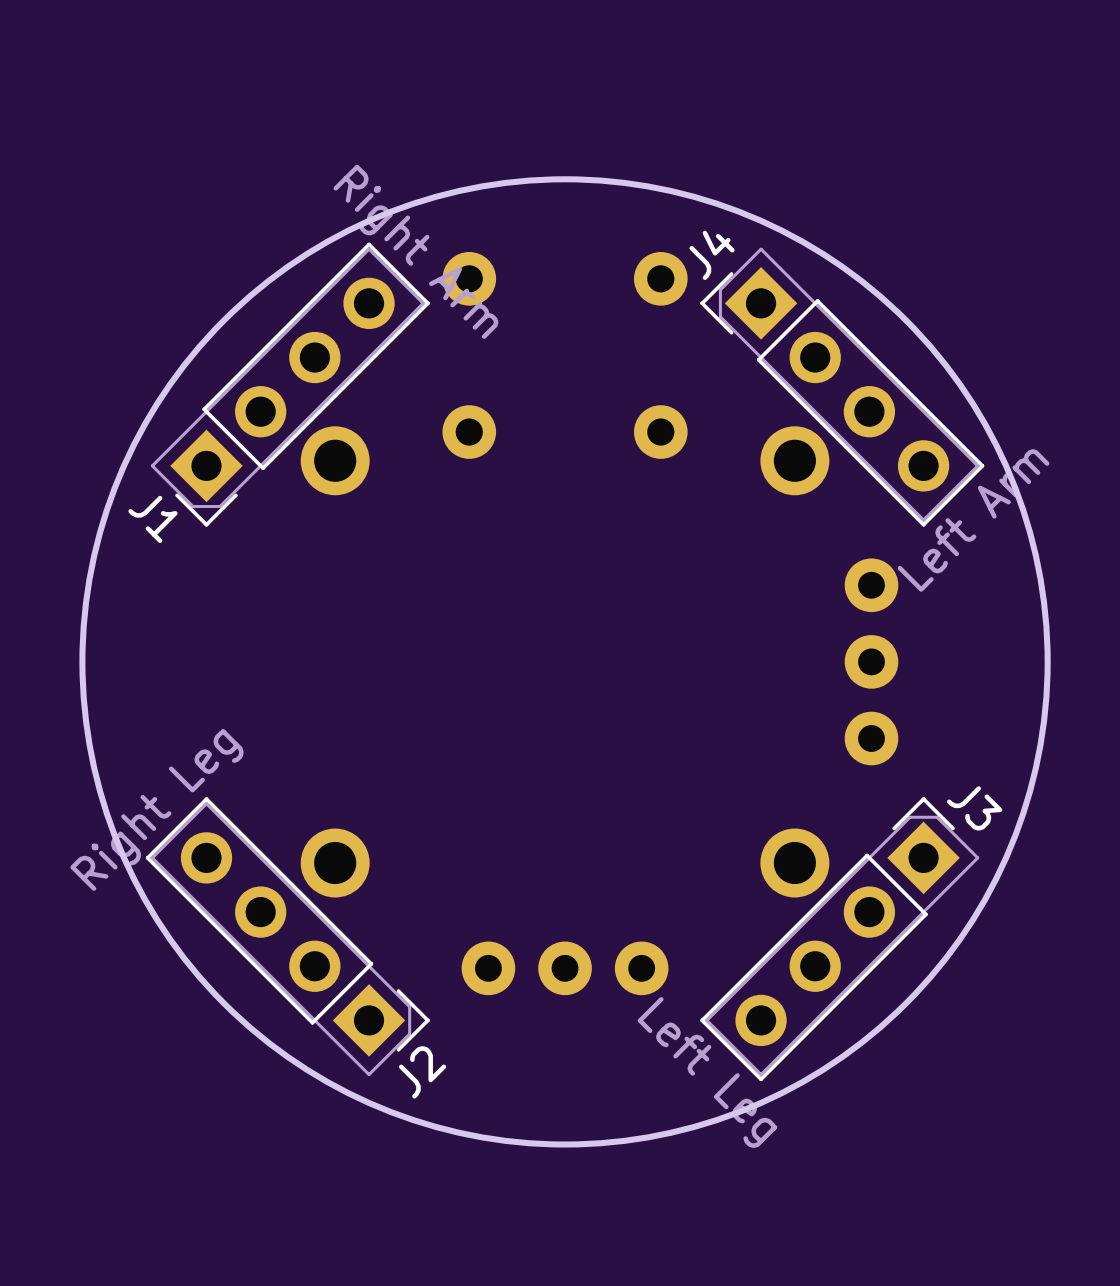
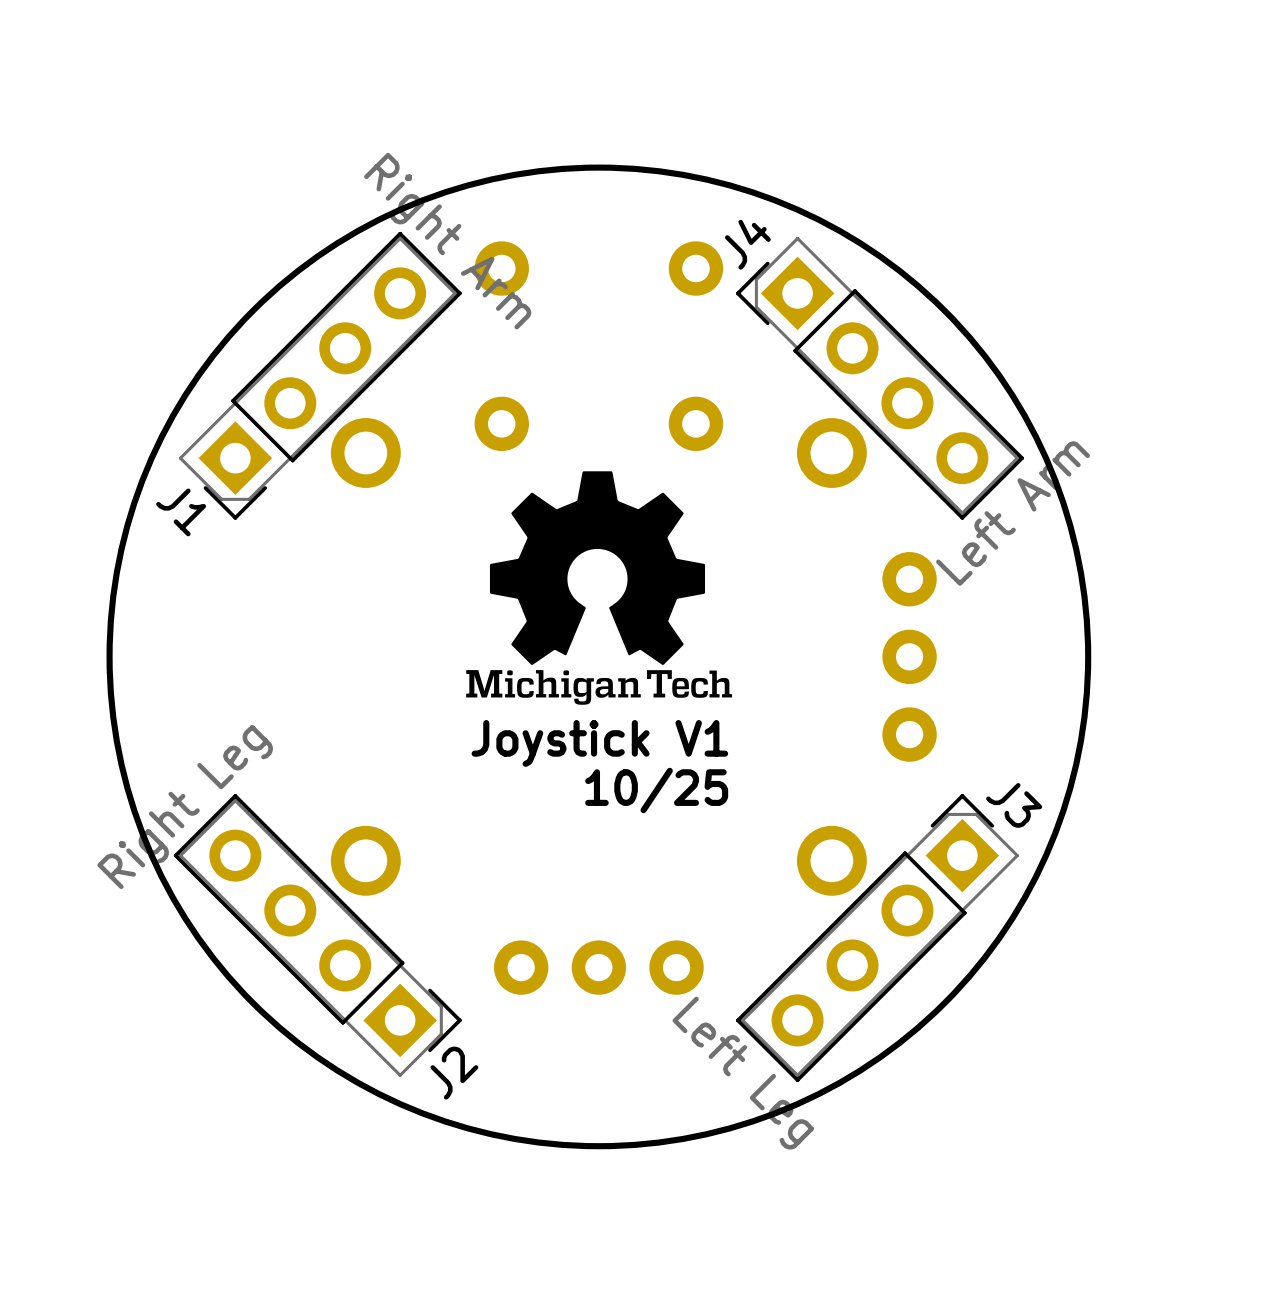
drawing: none -> [466, 471, 733, 705]
text: none -> Joystick V1 (599, 743)
text: none -> 10/25 (656, 790)

